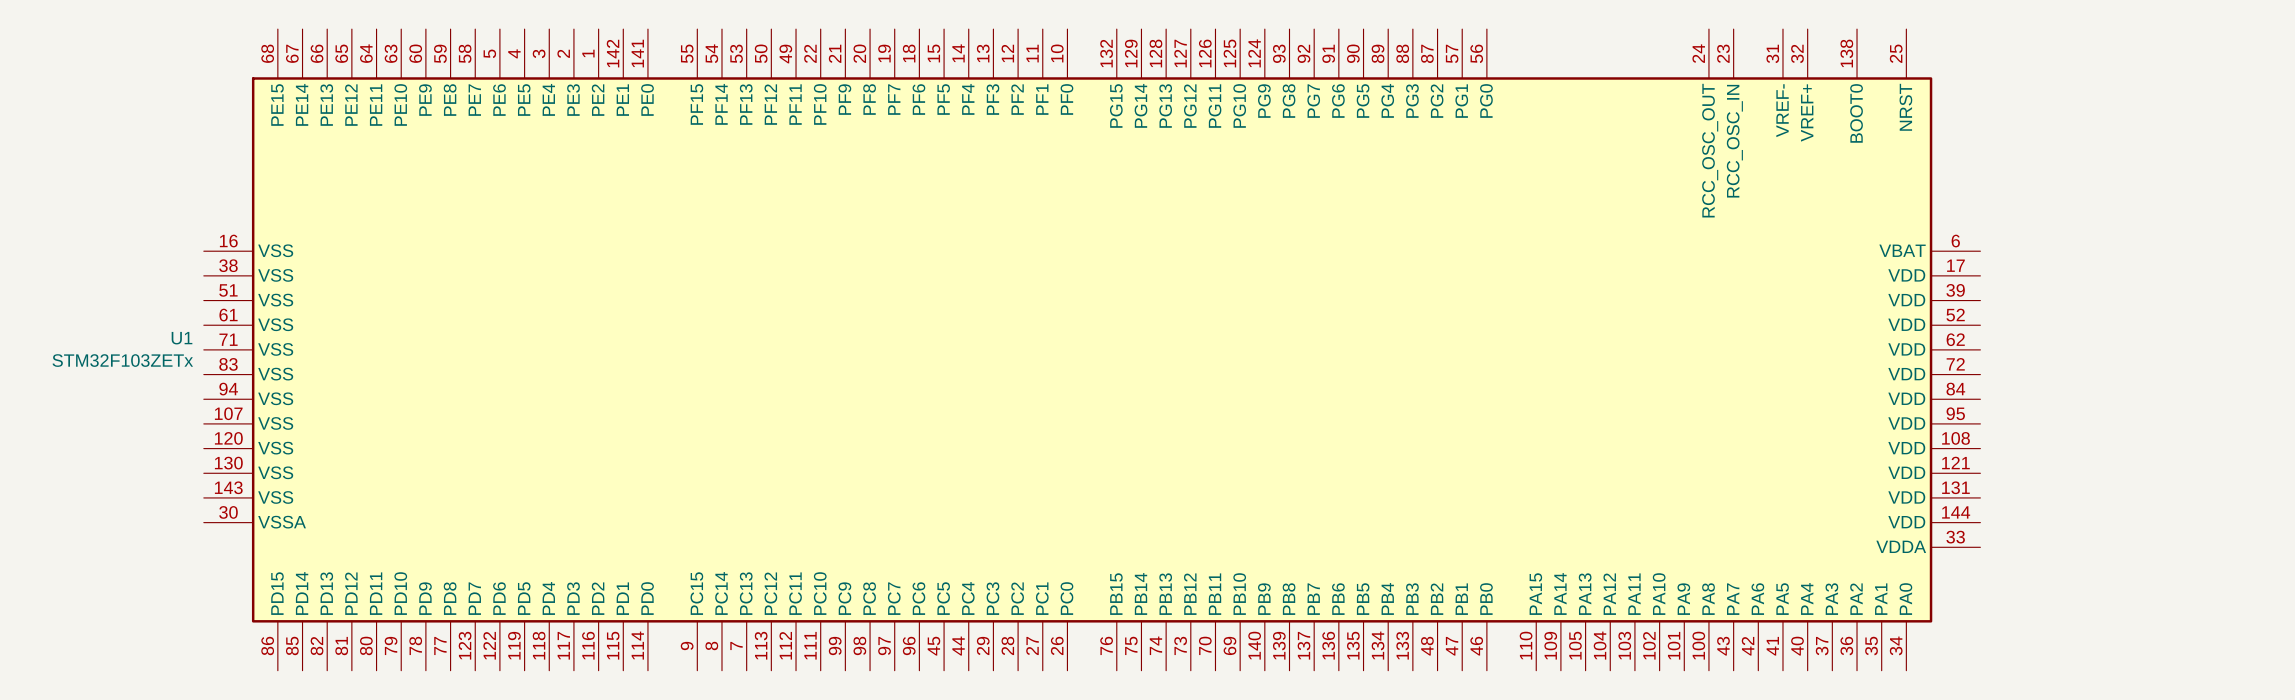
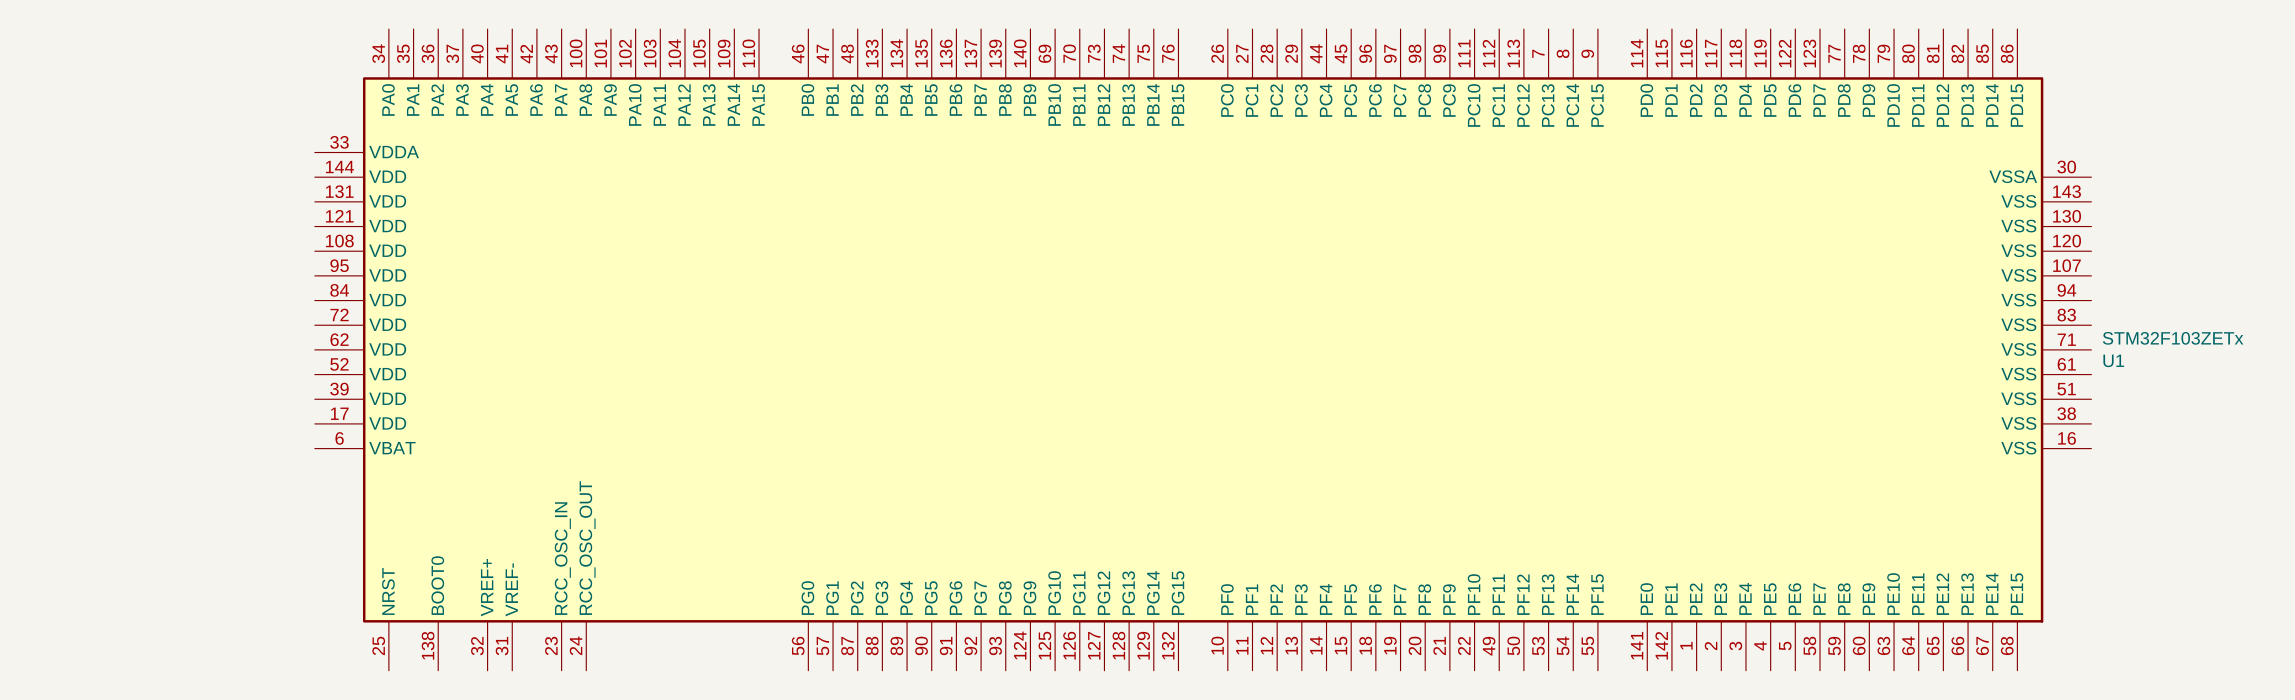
U1 rotation: 0° (1092, 349) -> 180° (1203, 349)

